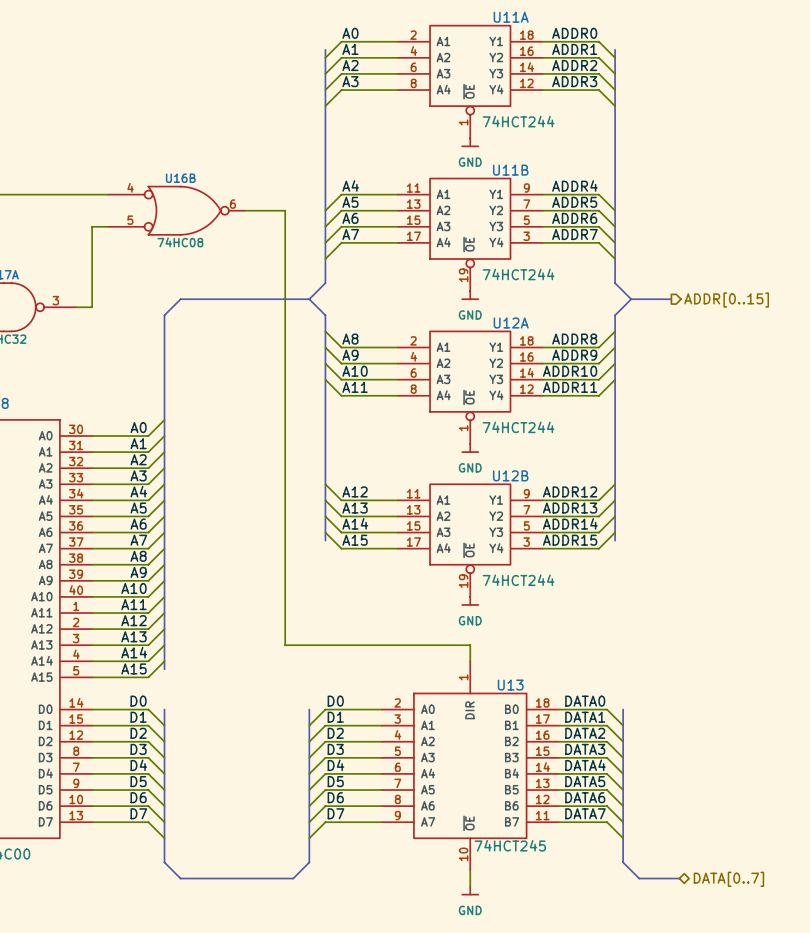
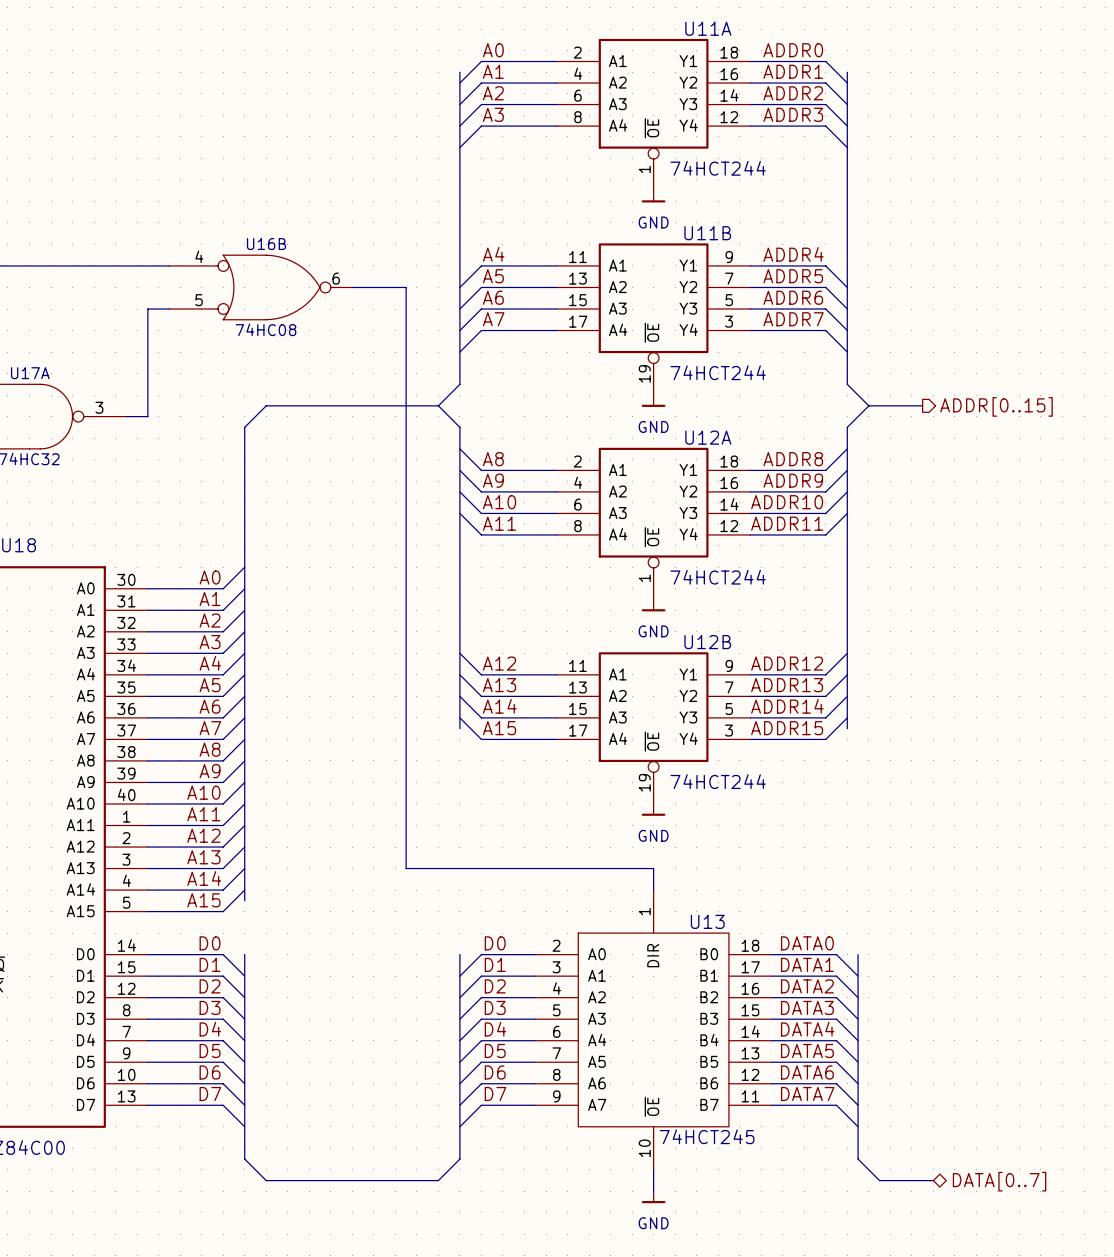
label position: D0 (335, 701) -> D0 (495, 943)
bus: (309, 709) (309, 862) (293, 878) -> (459, 954) (459, 1159) (438, 1180) (416, 1180)
wire: (341, 709) (325, 709) (309, 725) -> (481, 954) (459, 976)
label position: D1 (335, 717) -> D1 (495, 964)
wire: (341, 725) (325, 725) (309, 741) -> (481, 976) (459, 997)
label position: D2 (335, 733) -> D2 (495, 986)
wire: (341, 741) (325, 741) (309, 757) -> (481, 997) (459, 1019)
label position: D3 (335, 749) -> D3 (495, 1007)
wire: (341, 757) (325, 757) (309, 773) -> (481, 1019) (459, 1040)
label position: D4 (335, 765) -> D4 (495, 1029)
wire: (341, 773) (325, 773) (309, 790) -> (481, 1040) (459, 1062)
label position: D5 (335, 781) -> D5 (495, 1050)
wire: (341, 790) (325, 790) (309, 806) -> (481, 1062) (459, 1083)
label position: D6 (335, 797) -> D6 (495, 1072)
wire: (341, 806) (325, 806) (309, 822) -> (481, 1083) (459, 1105)
label position: D7 (335, 813) -> D7 (495, 1094)
wire: (341, 822) (325, 822) (309, 838) -> (481, 1105) (459, 1126)

